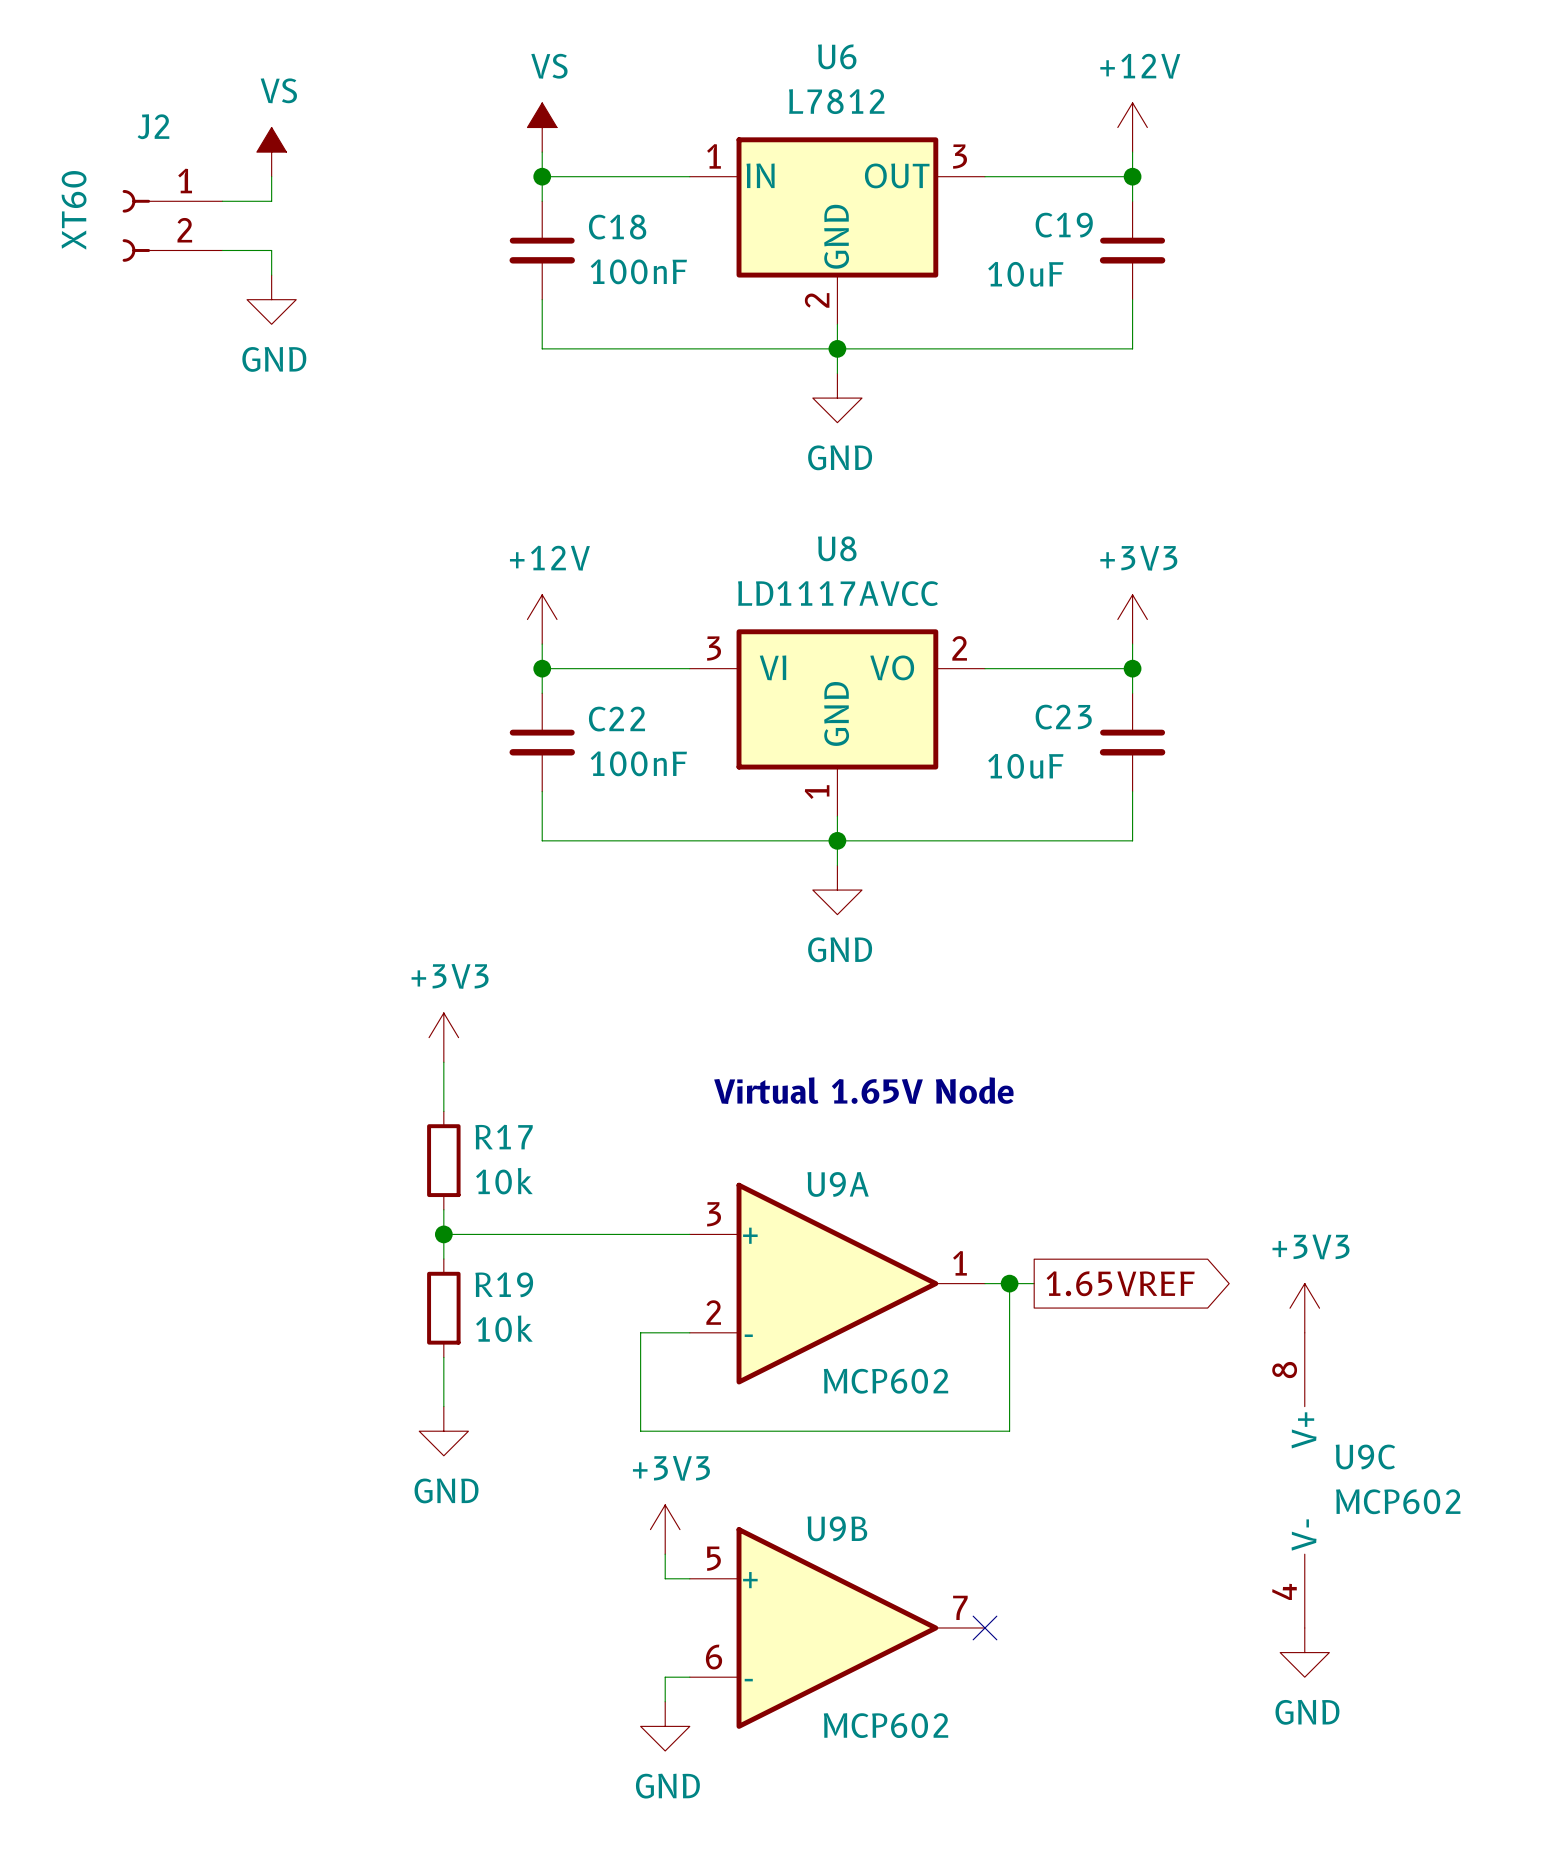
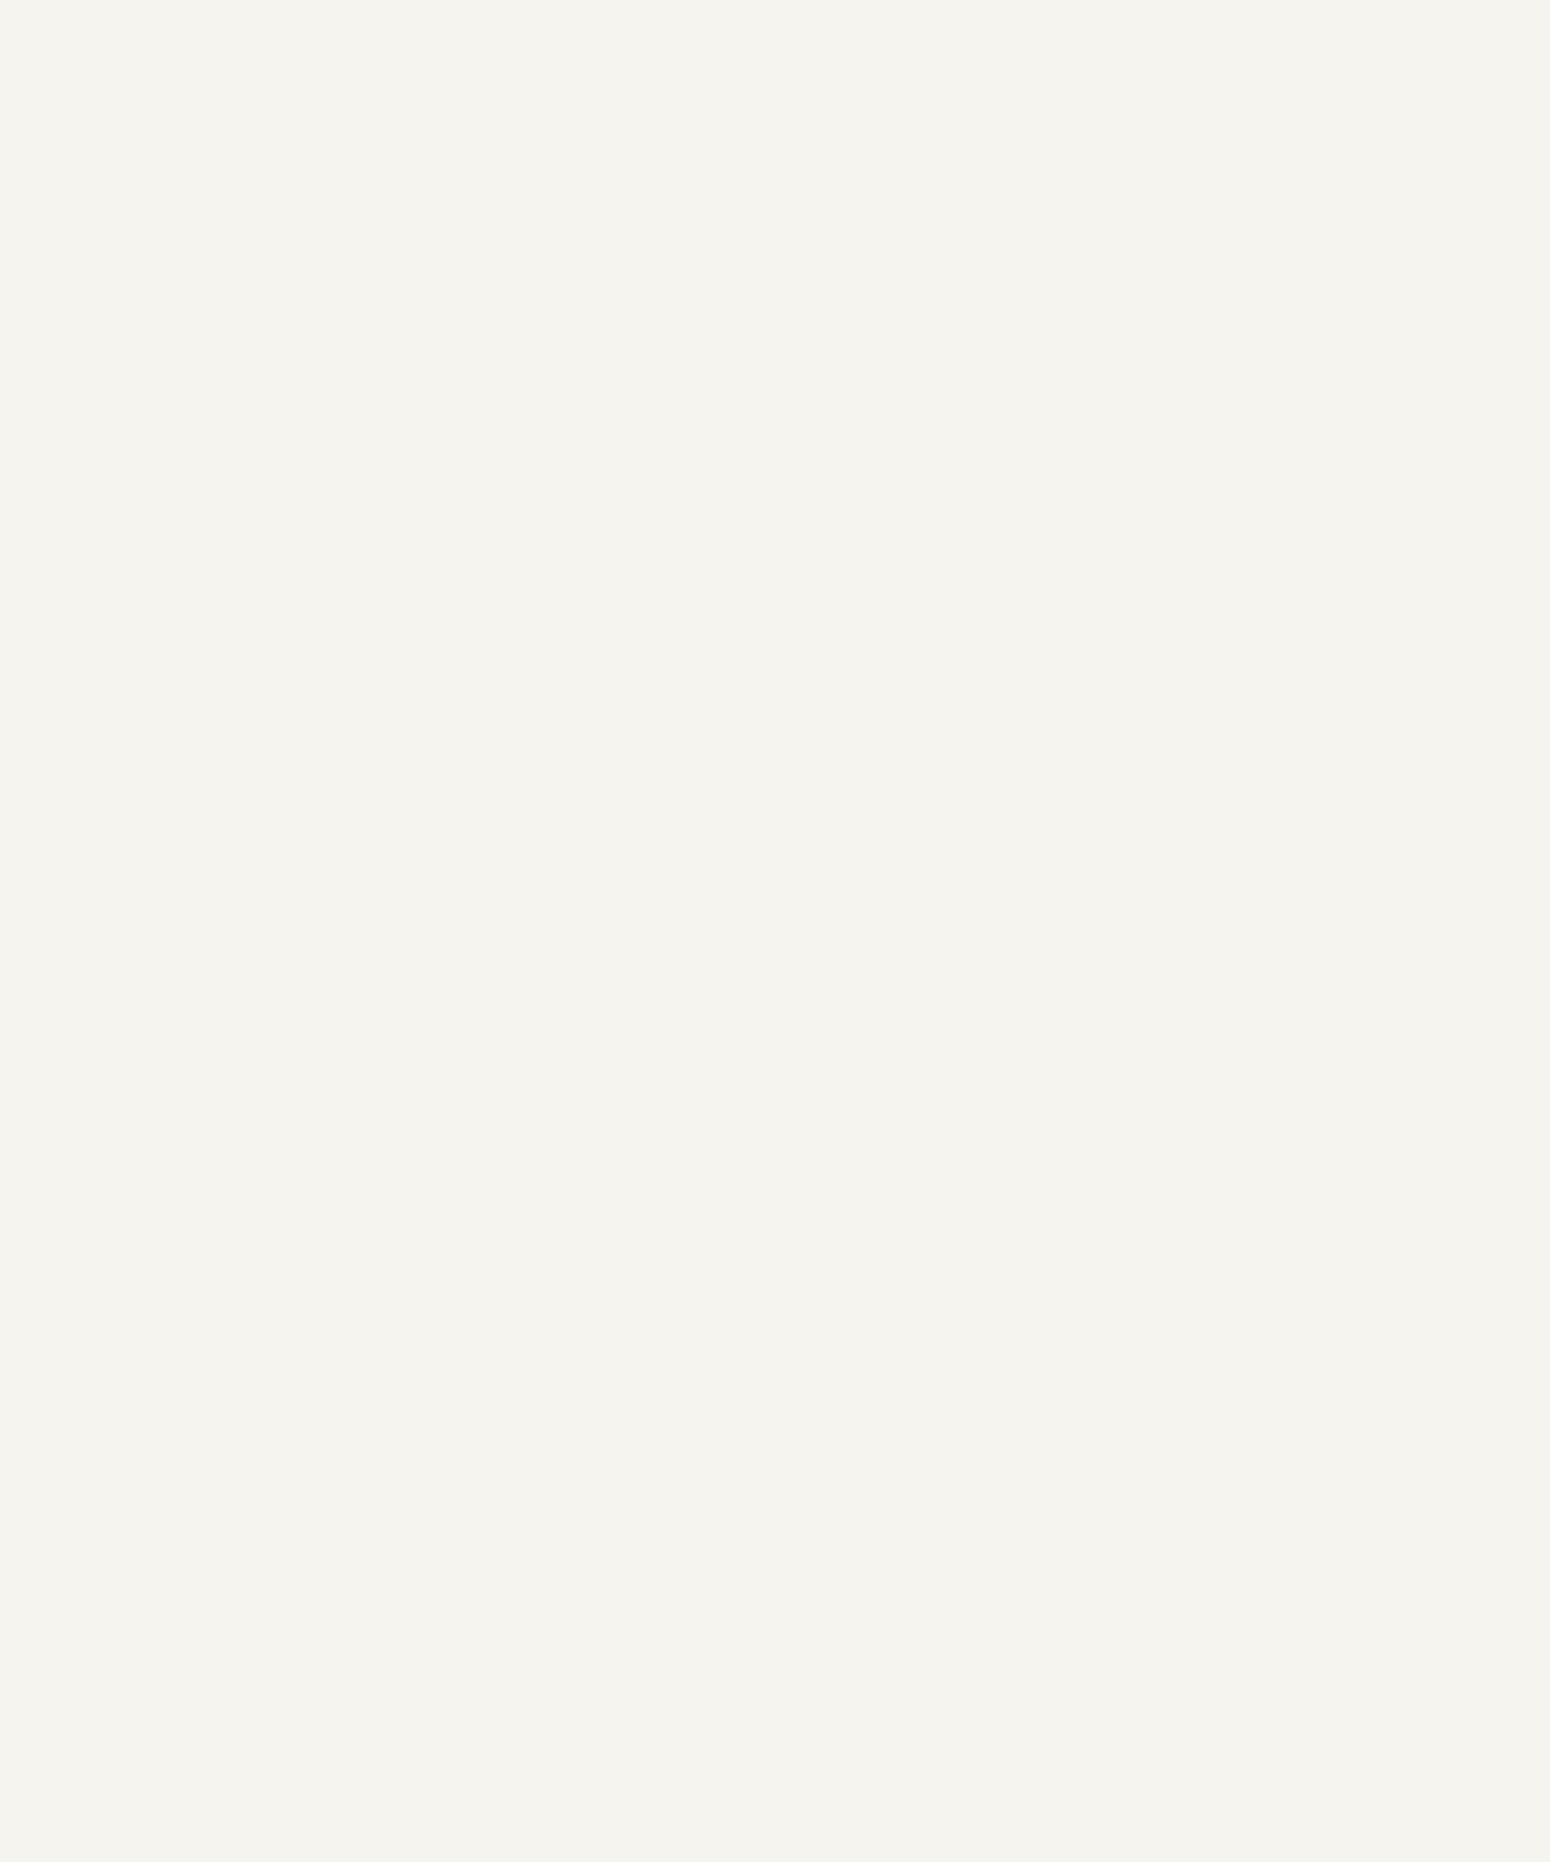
power symbol: VS (542, 127) -> none
power symbol: +12V (1132, 127) -> none
power symbol: VS (271, 152) -> none
wire: (542, 152) (542, 201) -> none
wire: (1132, 152) (1132, 201) -> none
wire: (271, 176) (271, 201) (222, 201) -> none
wire: (542, 176) (689, 176) -> none
junction: (542, 176) -> none
wire: (984, 176) (1132, 176) -> none
junction: (1132, 176) -> none
J2: XT60 (172, 225) -> none
U6: L7812 (837, 230) -> none
wire: (222, 250) (271, 250) (271, 275) -> none
C18: 100nF (542, 250) -> none
C19: 10uF (1132, 250) -> none
power symbol: GND (271, 299) -> none
wire: (542, 299) (542, 348) (1132, 348) (1132, 299) -> none
wire: (837, 324) (837, 373) -> none
junction: (837, 348) -> none
power symbol: GND (837, 398) -> none
power symbol: +12V (542, 619) -> none
power symbol: +3V3 (1132, 619) -> none
wire: (542, 644) (542, 693) -> none
wire: (1132, 644) (1132, 693) -> none
wire: (542, 668) (689, 668) -> none
junction: (542, 668) -> none
wire: (984, 668) (1132, 668) -> none
junction: (1132, 668) -> none
U8: LD1117AVCC (837, 722) -> none
C22: 100nF (542, 742) -> none
C23: 10uF (1132, 742) -> none
wire: (542, 791) (542, 840) (1132, 840) (1132, 791) -> none
wire: (837, 816) (837, 865) -> none
junction: (837, 840) -> none
power symbol: GND (837, 890) -> none
power symbol: +3V3 (443, 1037) -> none
wire: (443, 1062) (443, 1111) -> none
text: Virtual 1.65V Node (863, 1090) -> none
R17: 10k (443, 1160) -> none
wire: (443, 1209) (443, 1259) -> none
wire: (443, 1234) (689, 1234) -> none
junction: (443, 1234) -> none
U9A: MCP602 (837, 1283) -> none
wire: (984, 1283) (1034, 1283) -> none
wire: (1009, 1283) (1009, 1431) (640, 1431) (640, 1332) (689, 1332) -> none
junction: (1009, 1283) -> none
global label: 1.65VREF (1120, 1283) -> none
R19: 10k (443, 1308) -> none
power symbol: +3V3 (1304, 1308) -> none
wire: (443, 1357) (443, 1406) -> none
power symbol: GND (443, 1431) -> none
U9C: MCP602 (1304, 1480) -> none
power symbol: +3V3 (665, 1529) -> none
wire: (665, 1554) (665, 1578) (689, 1578) -> none
U9B: MCP602 (837, 1627) -> none
no-connect mark: (984, 1627) -> none
power symbol: GND (1304, 1652) -> none
wire: (689, 1677) (665, 1677) (665, 1701) -> none
power symbol: GND (665, 1726) -> none

